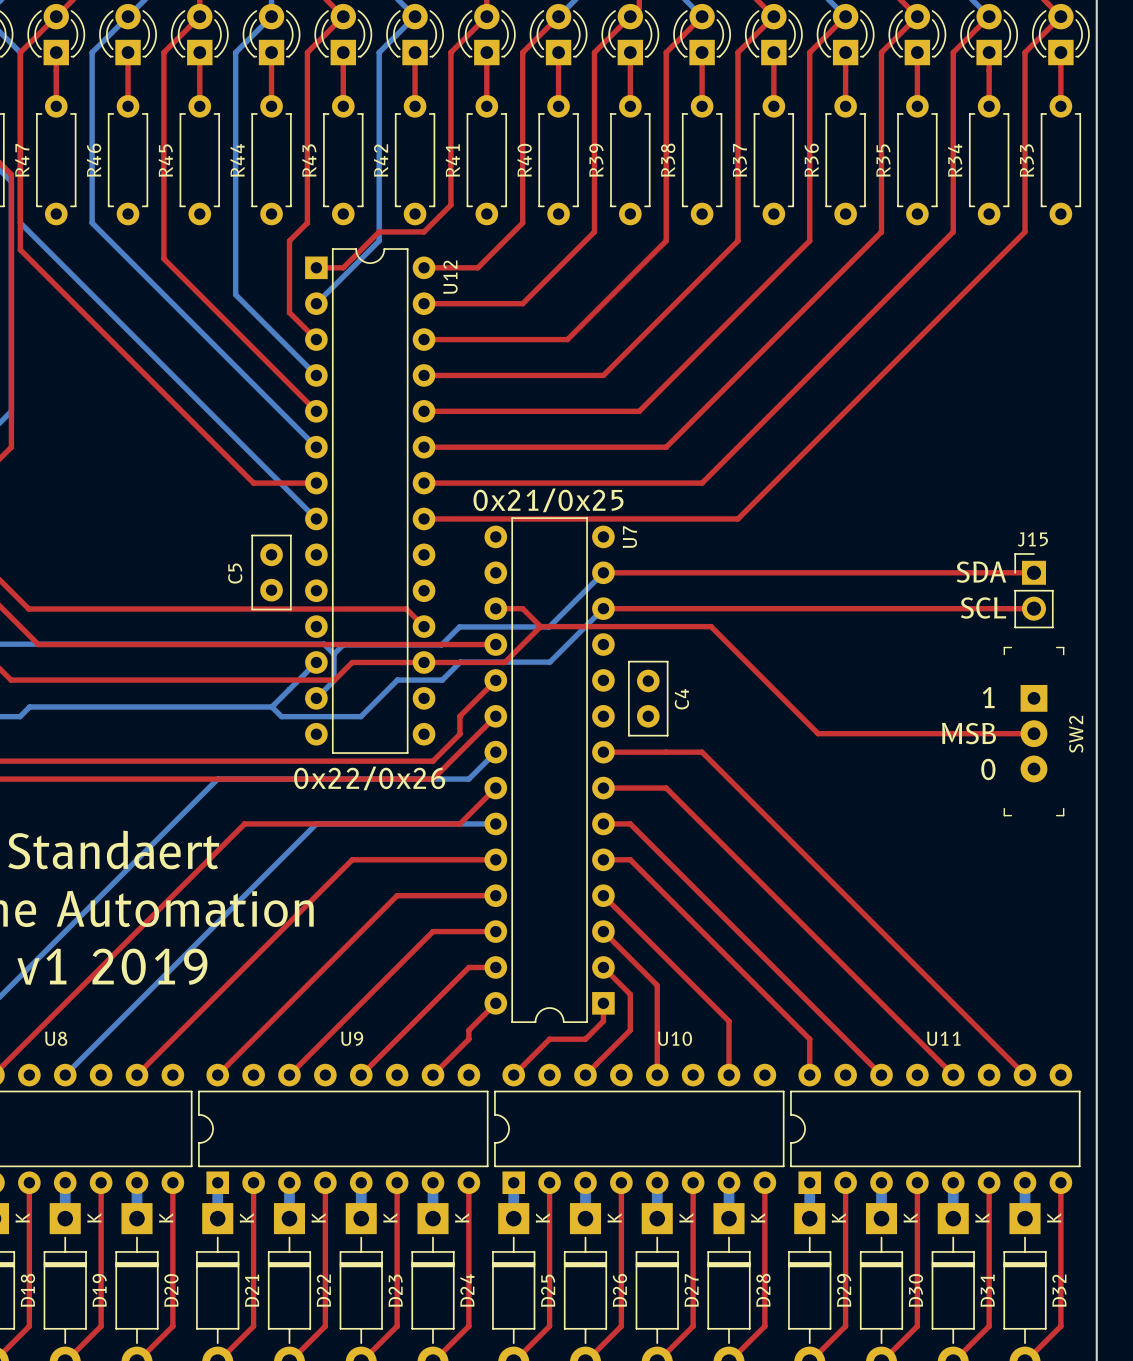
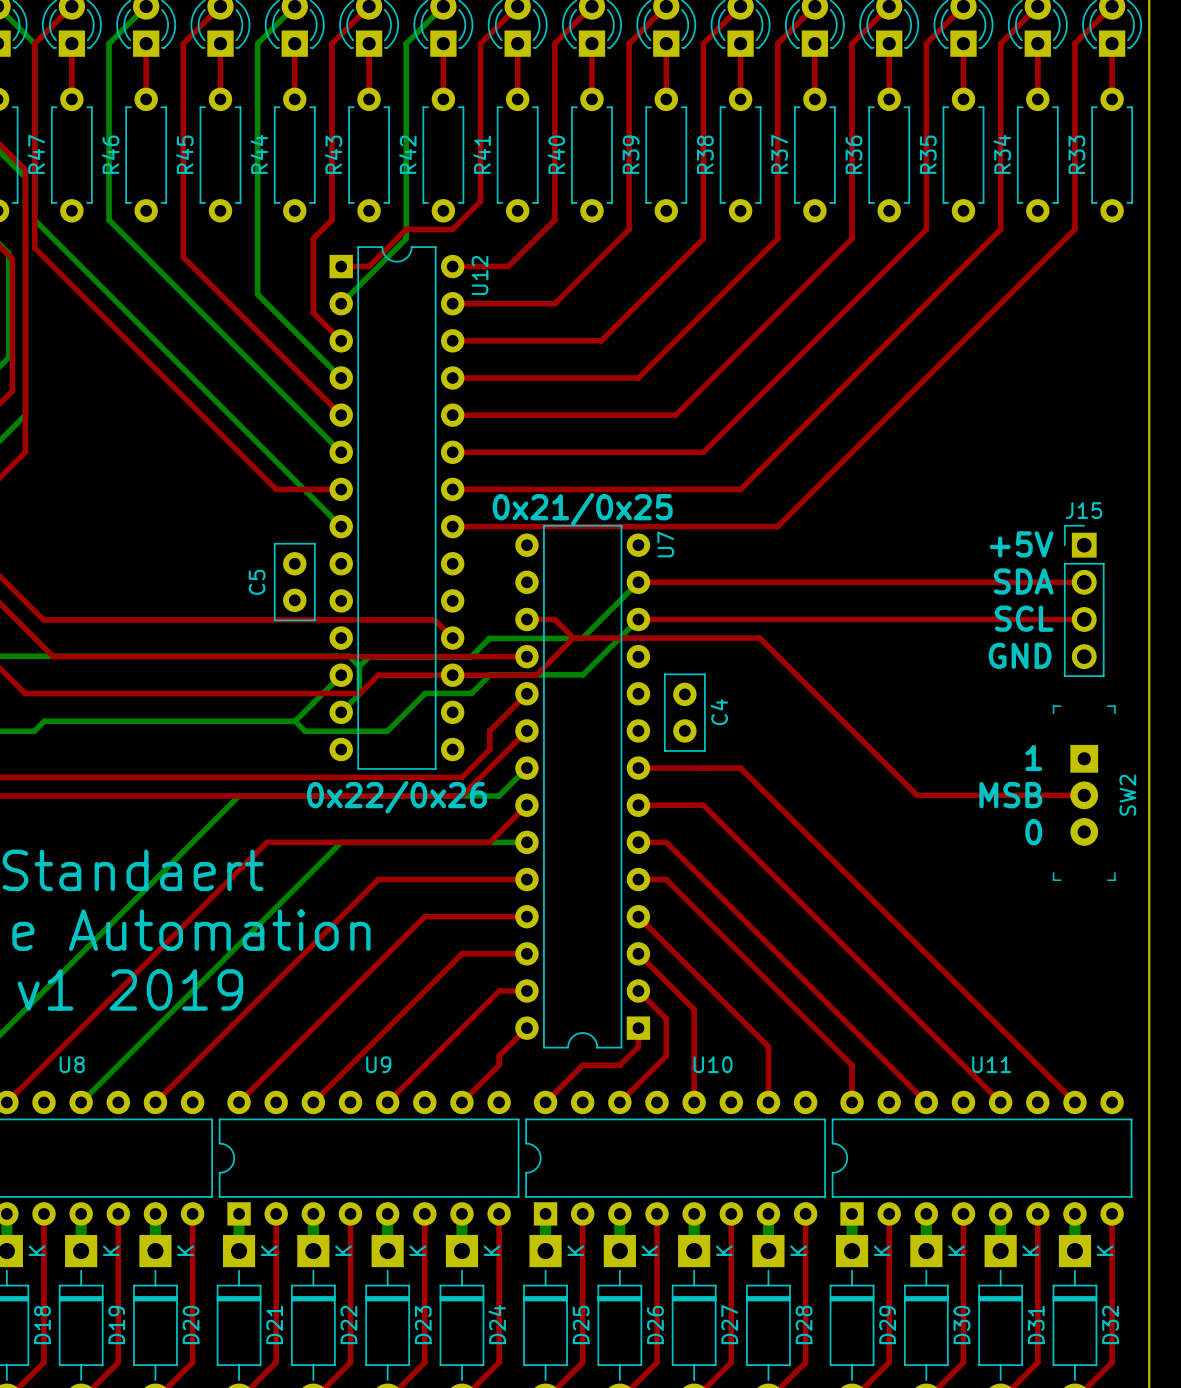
text: none -> +5V (1021, 544)
J15 name position: J15 (1032, 539) -> J15 (1083, 510)
J15 footprint: [1014, 553, 1054, 629] -> [1063, 524, 1105, 677]
top track: (711, 626) (818, 733) (1033, 733) -> (749, 638) (759, 638) (917, 795) (1084, 795)
text: none -> GND (1020, 655)
text: 1 (988, 697) -> none
SW2 position: (1033, 731) -> (1084, 793)
text: MSB (968, 733) -> 1 (1033, 757)
text: 0 (988, 769) -> MSB (1010, 795)
text: none -> 0 (1033, 832)

